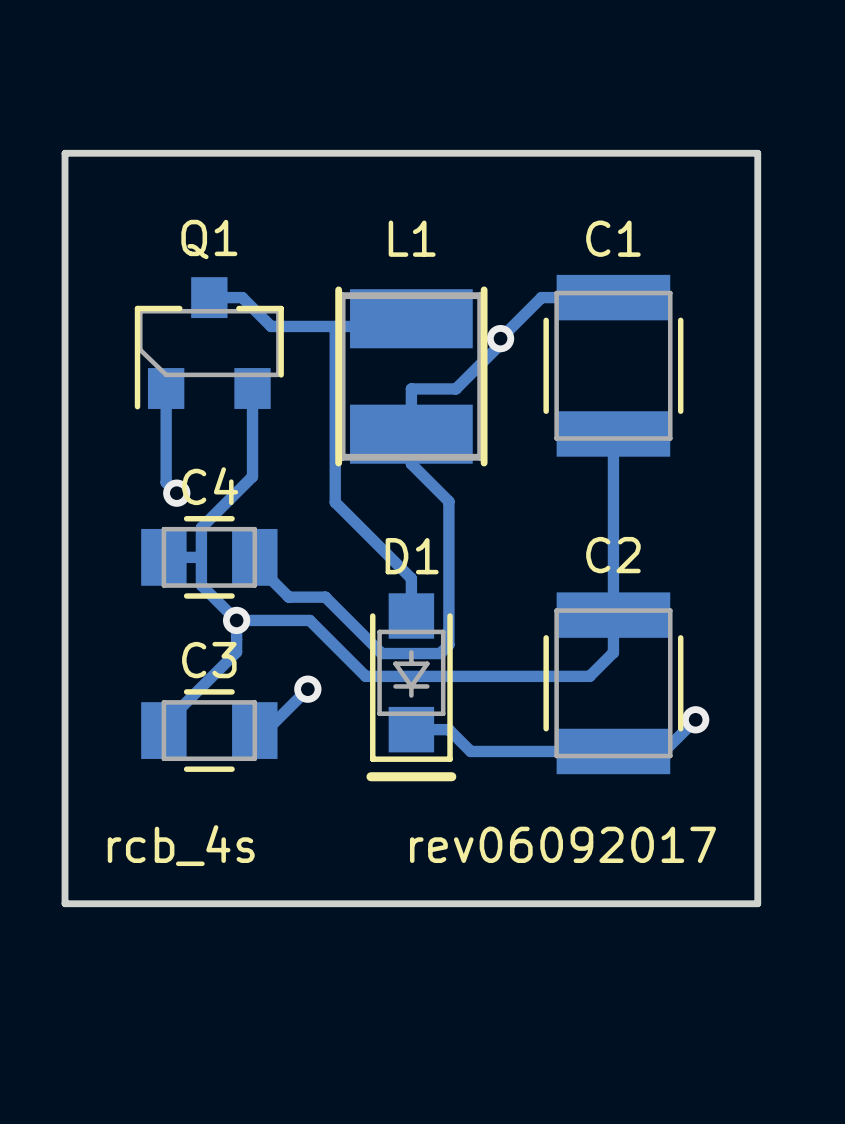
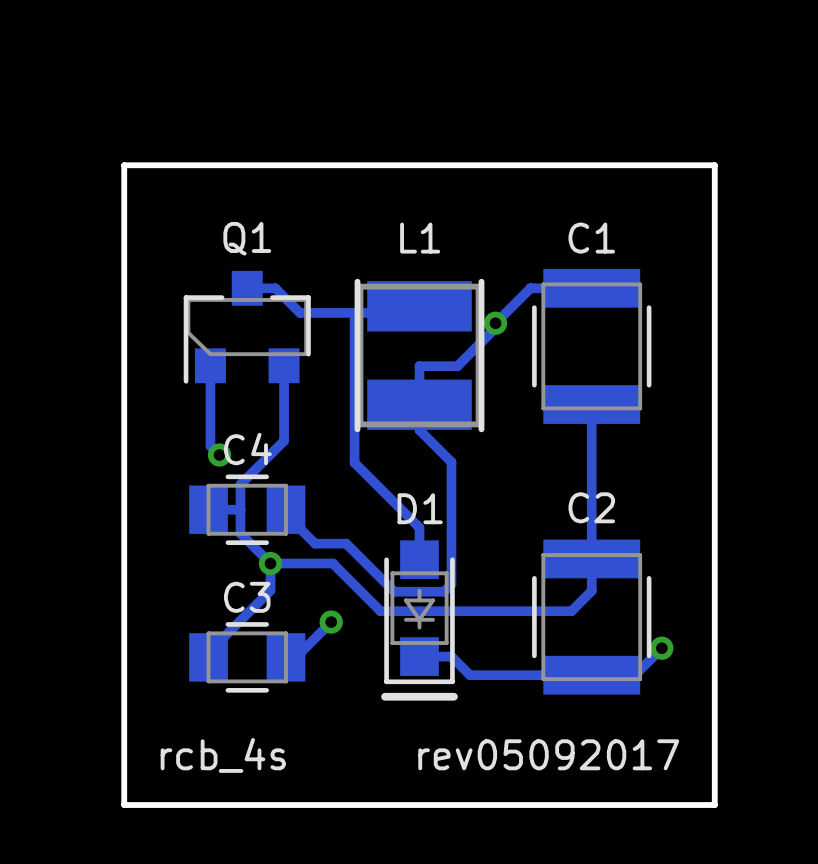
text: rev06092017 (563, 844) -> rev05092017 (548, 754)

